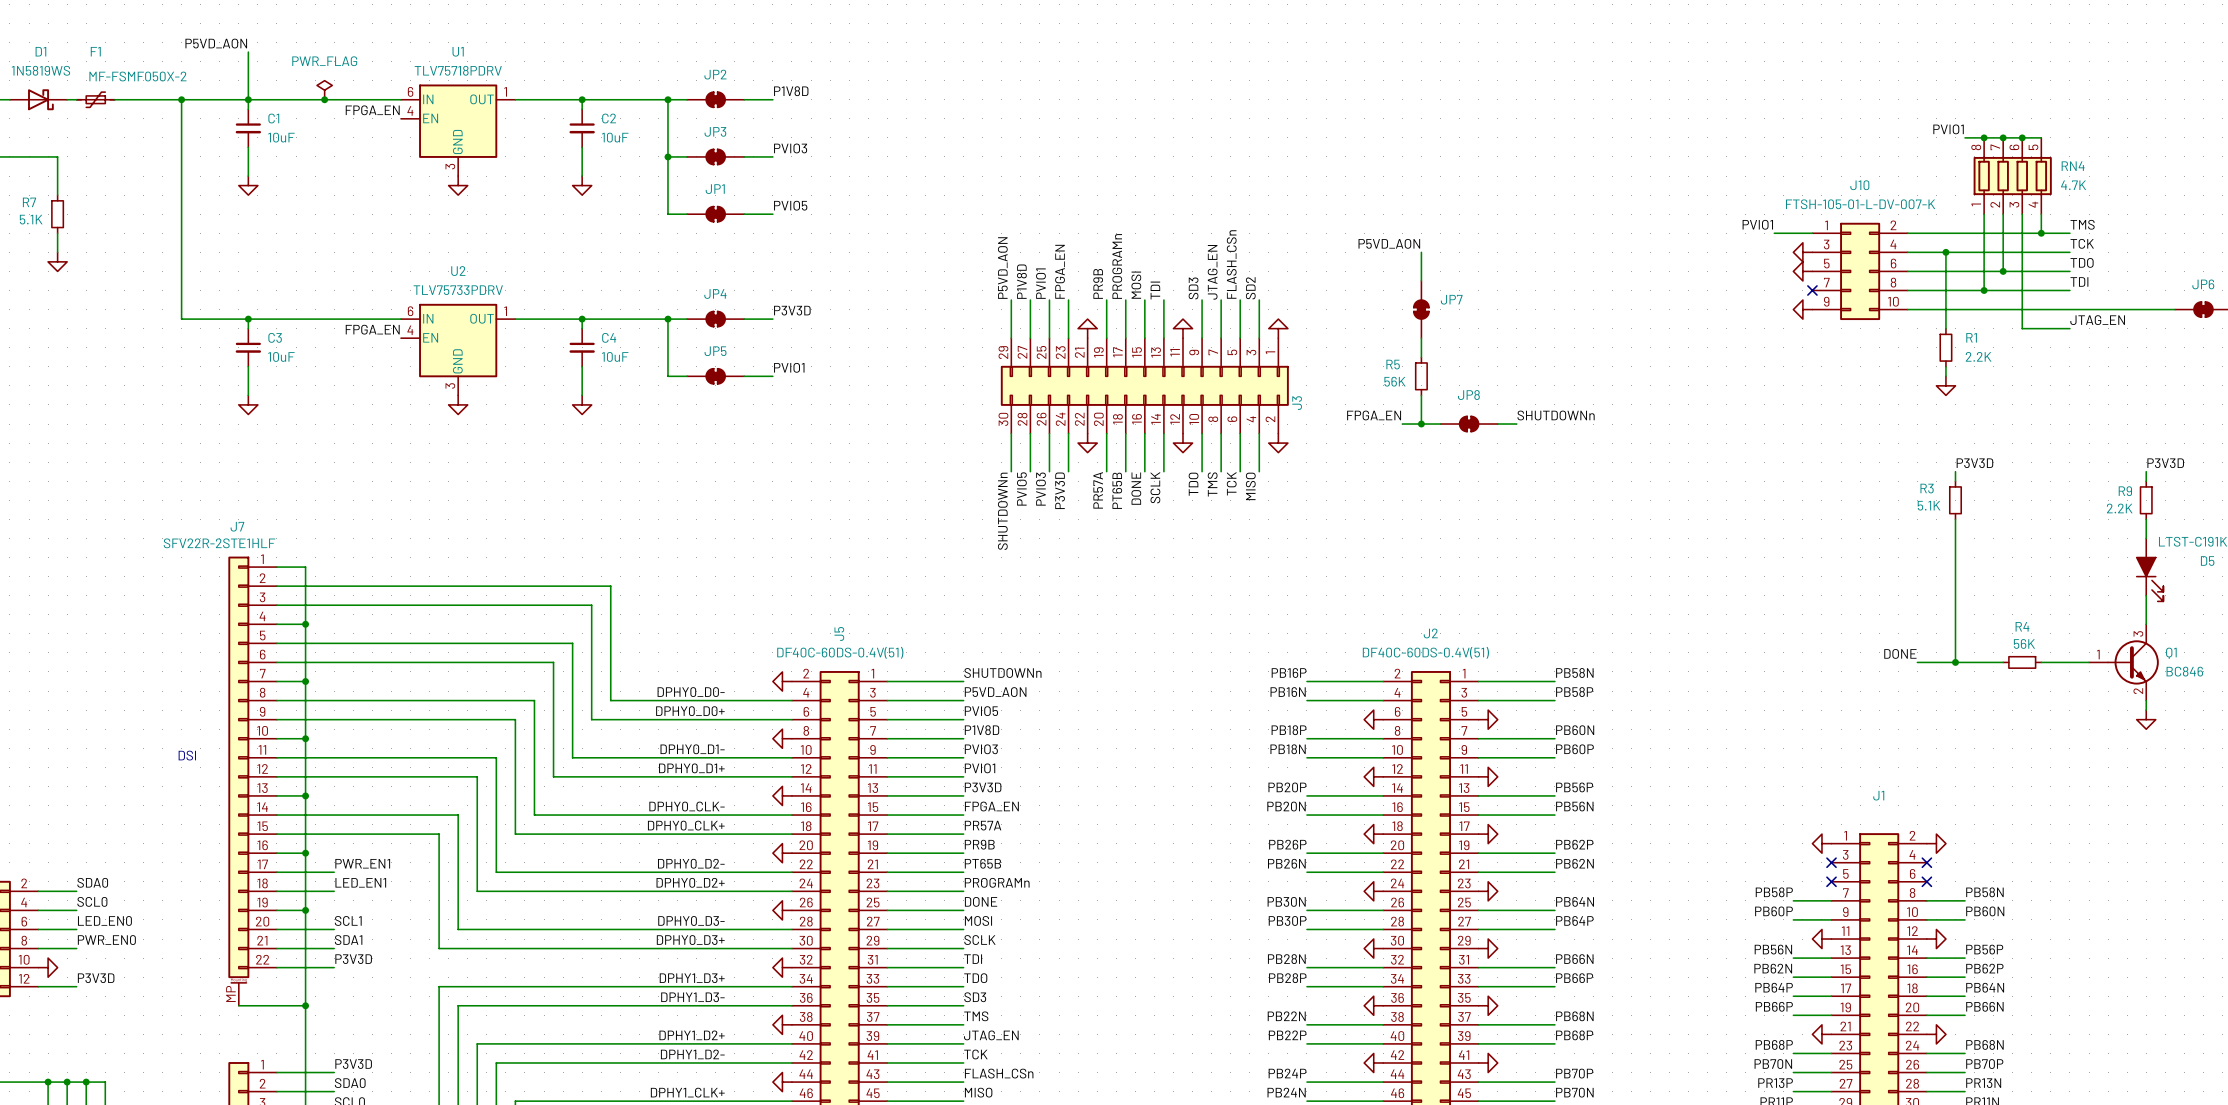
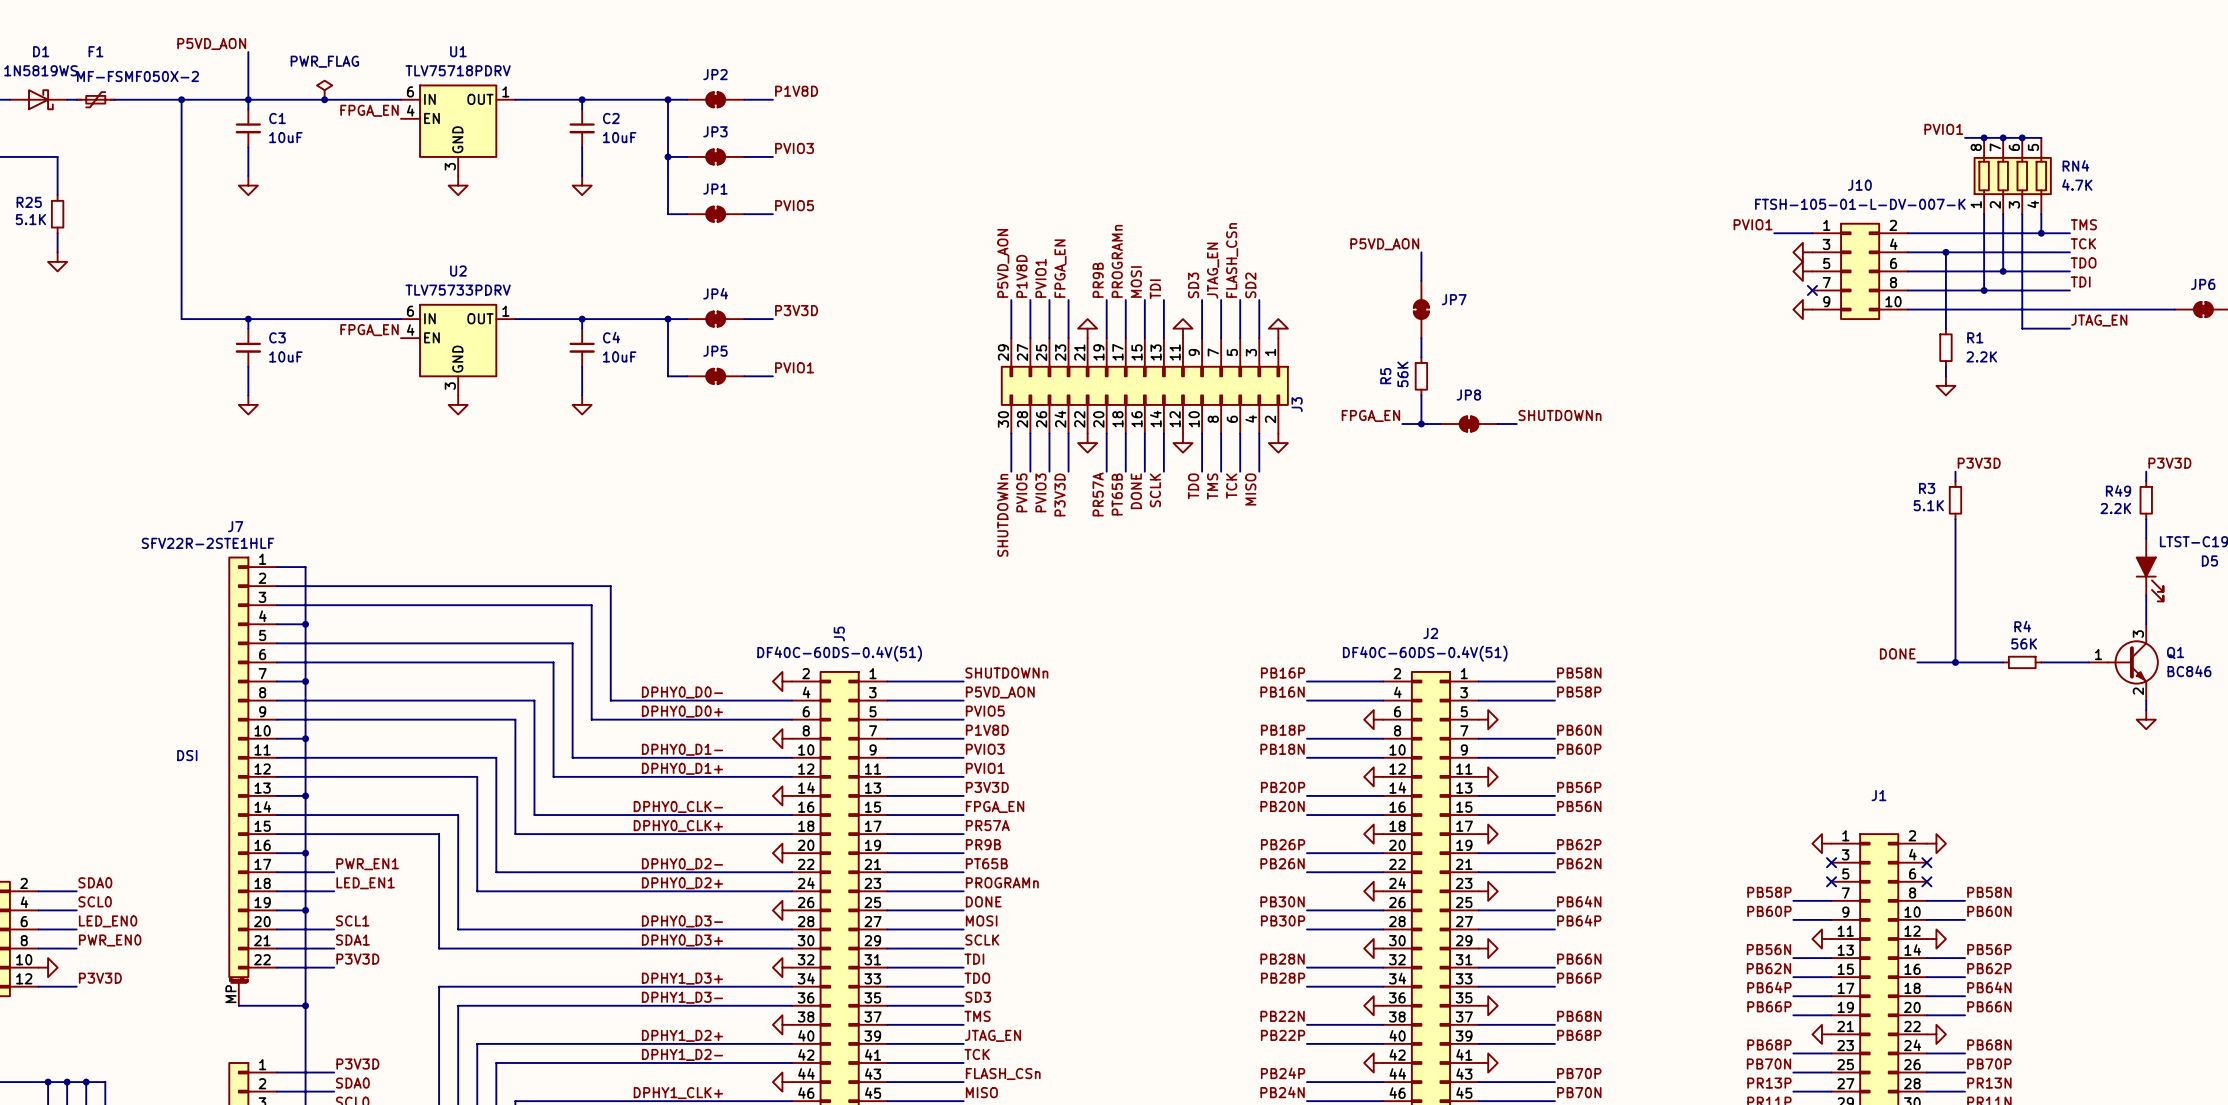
R7 name: R7 (29, 202) -> R25 (29, 202)
R5 name rotation: 0° (1393, 364) -> 90° counterclockwise (1385, 376)
R5 value rotation: 0° (1394, 381) -> 90° counterclockwise (1402, 374)
R9 name: R9 (2125, 491) -> R49 (2118, 490)

